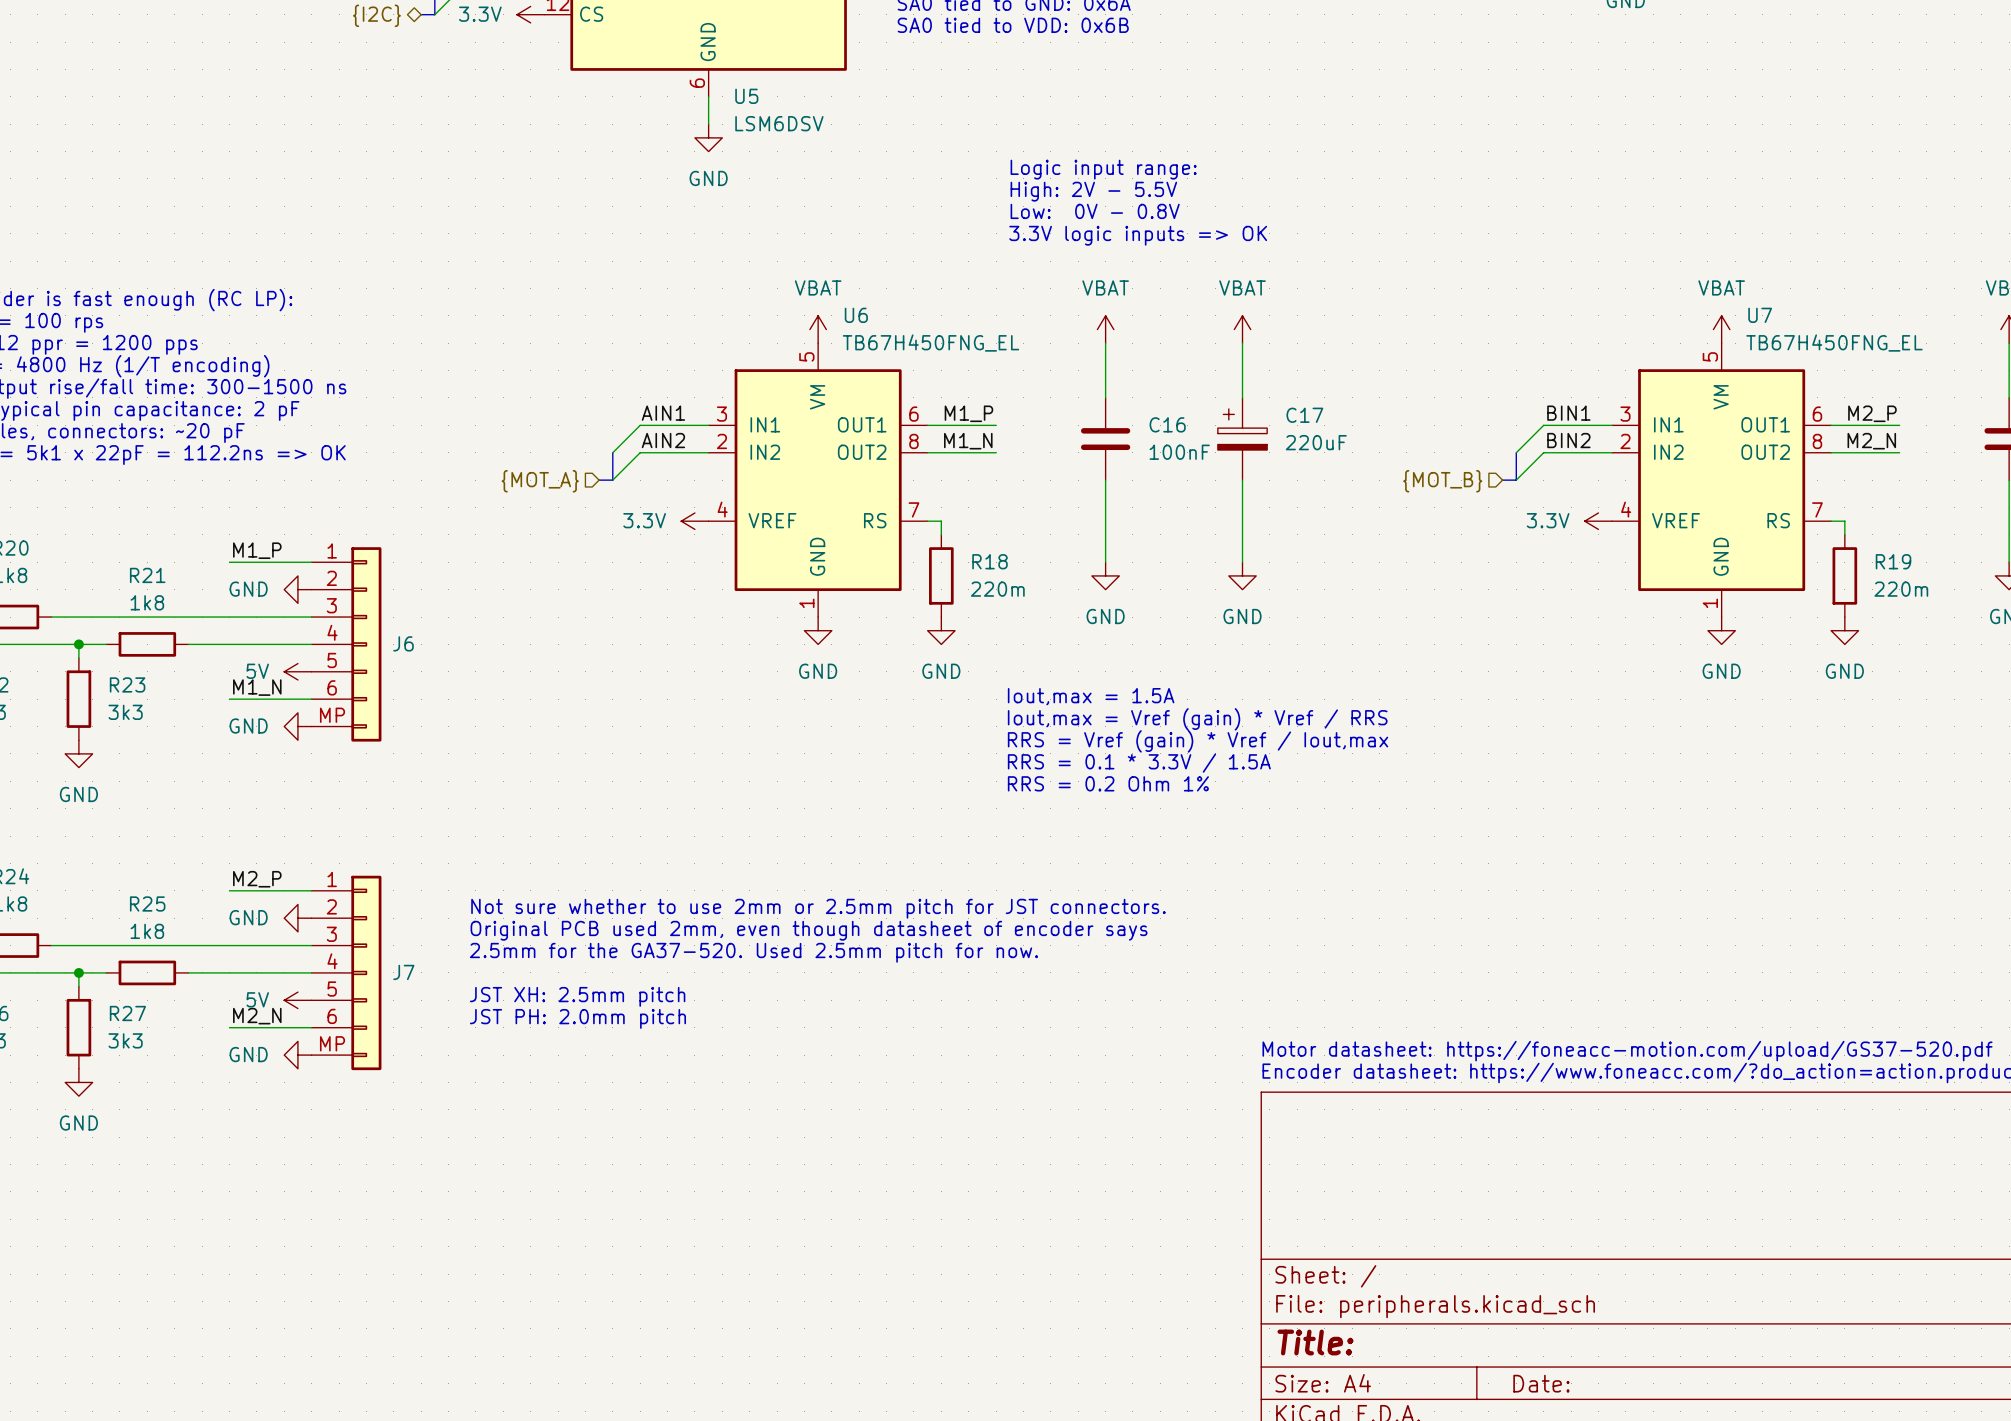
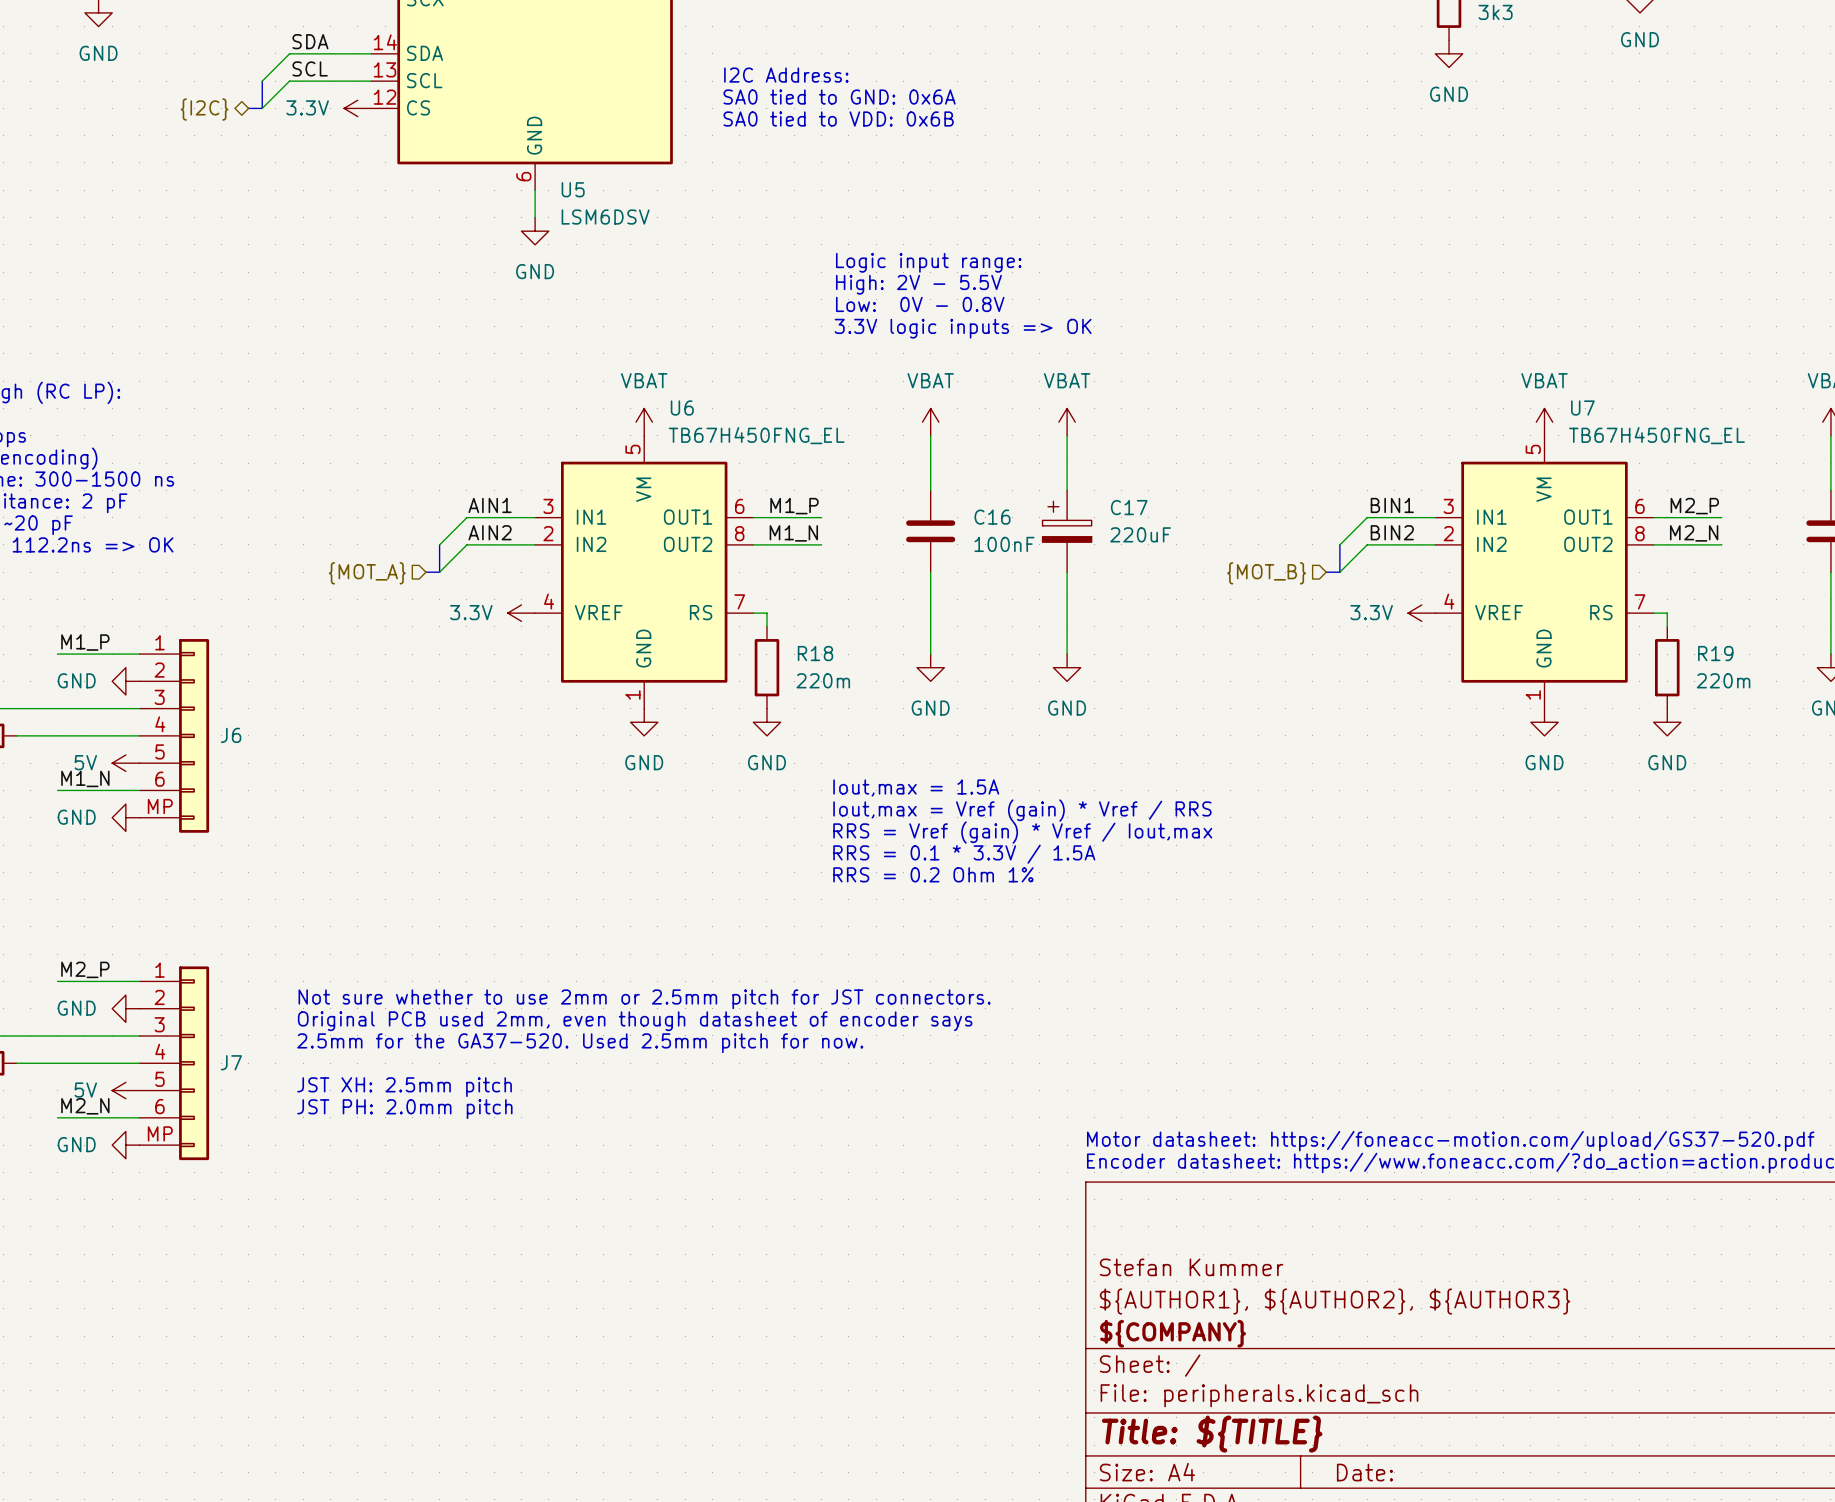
title block: none -> Stefan Kummer (1191, 1267)
title block: none -> ${AUTHOR1}, ${AUTHOR2}, ${AUTHOR3} (1335, 1301)
title block: none -> ${COMPANY} (1173, 1333)
title block: Title: (1315, 1342) -> Title: ${TITLE} (1212, 1434)

